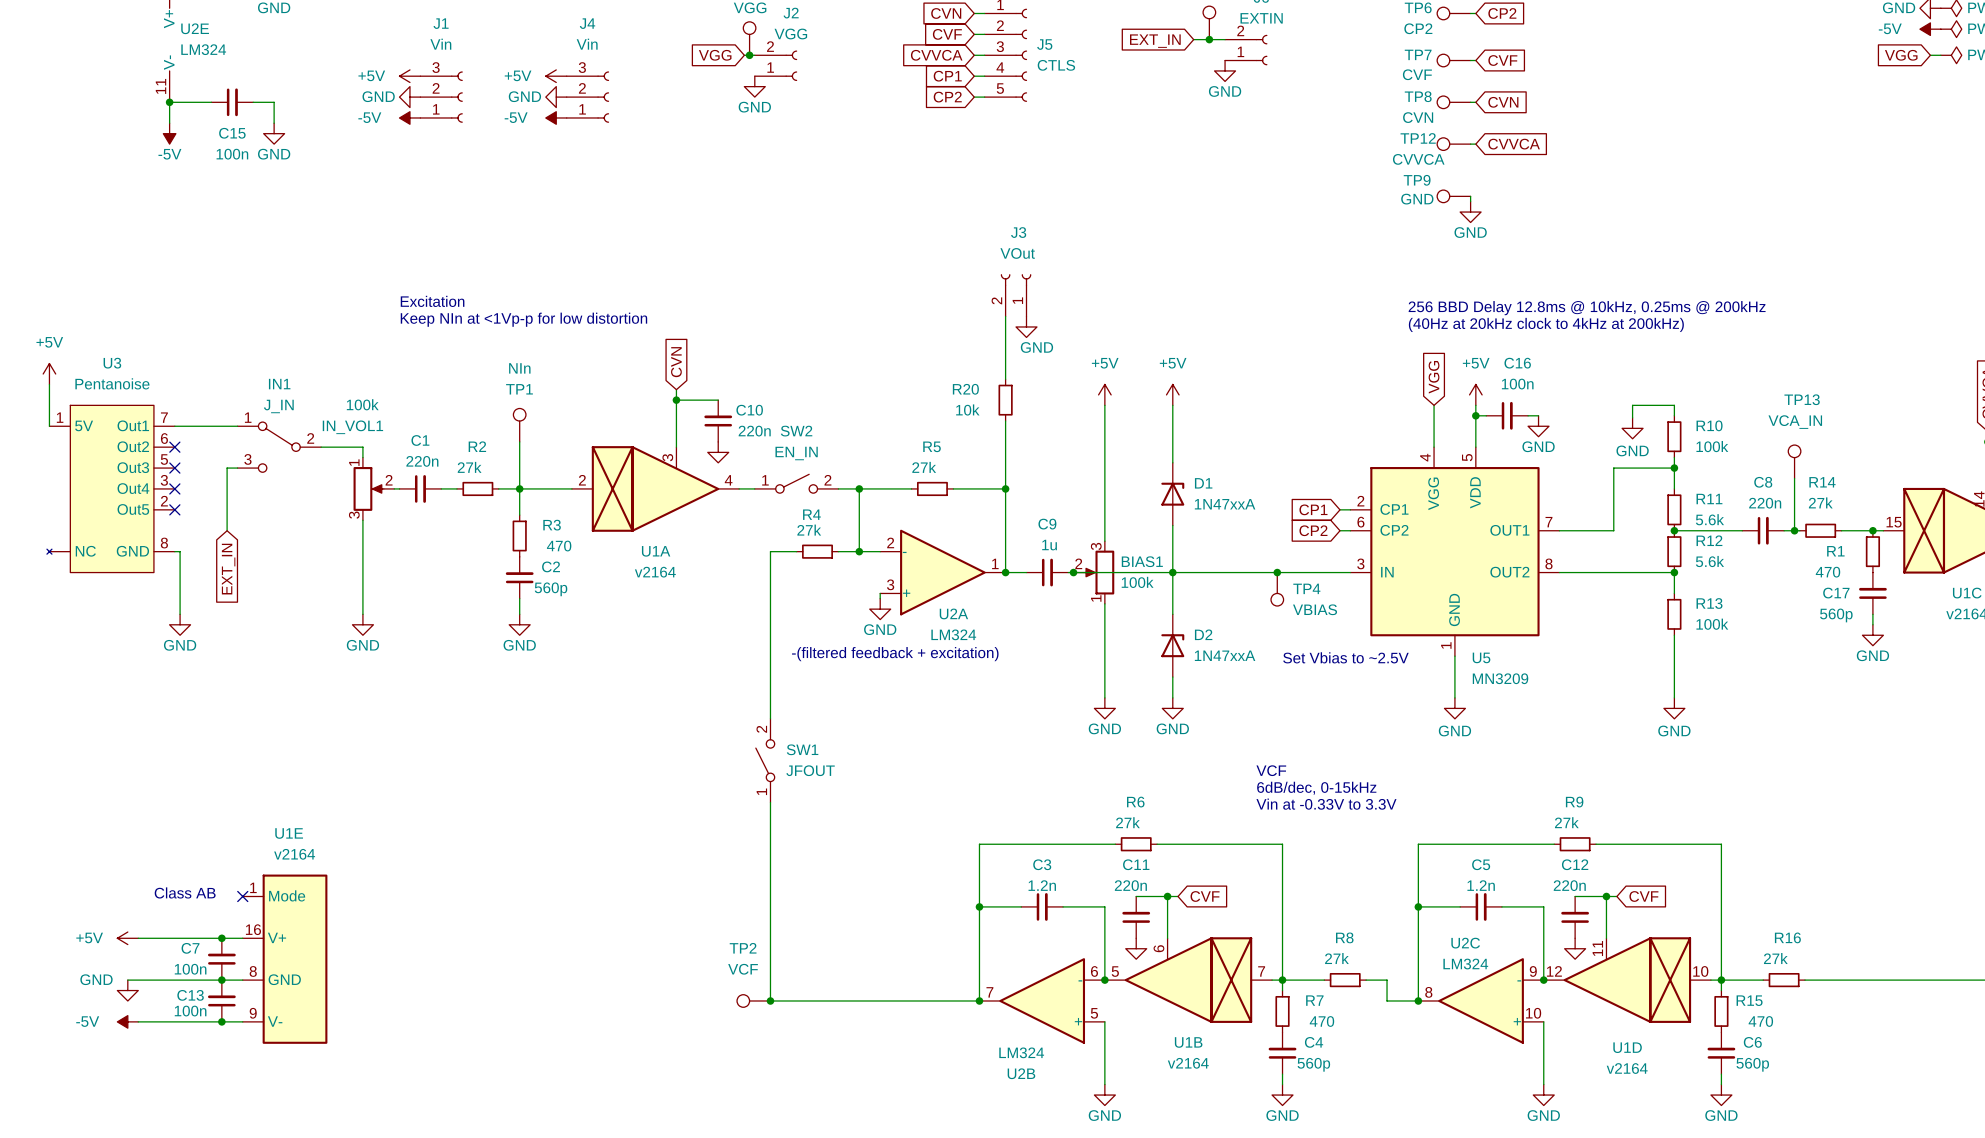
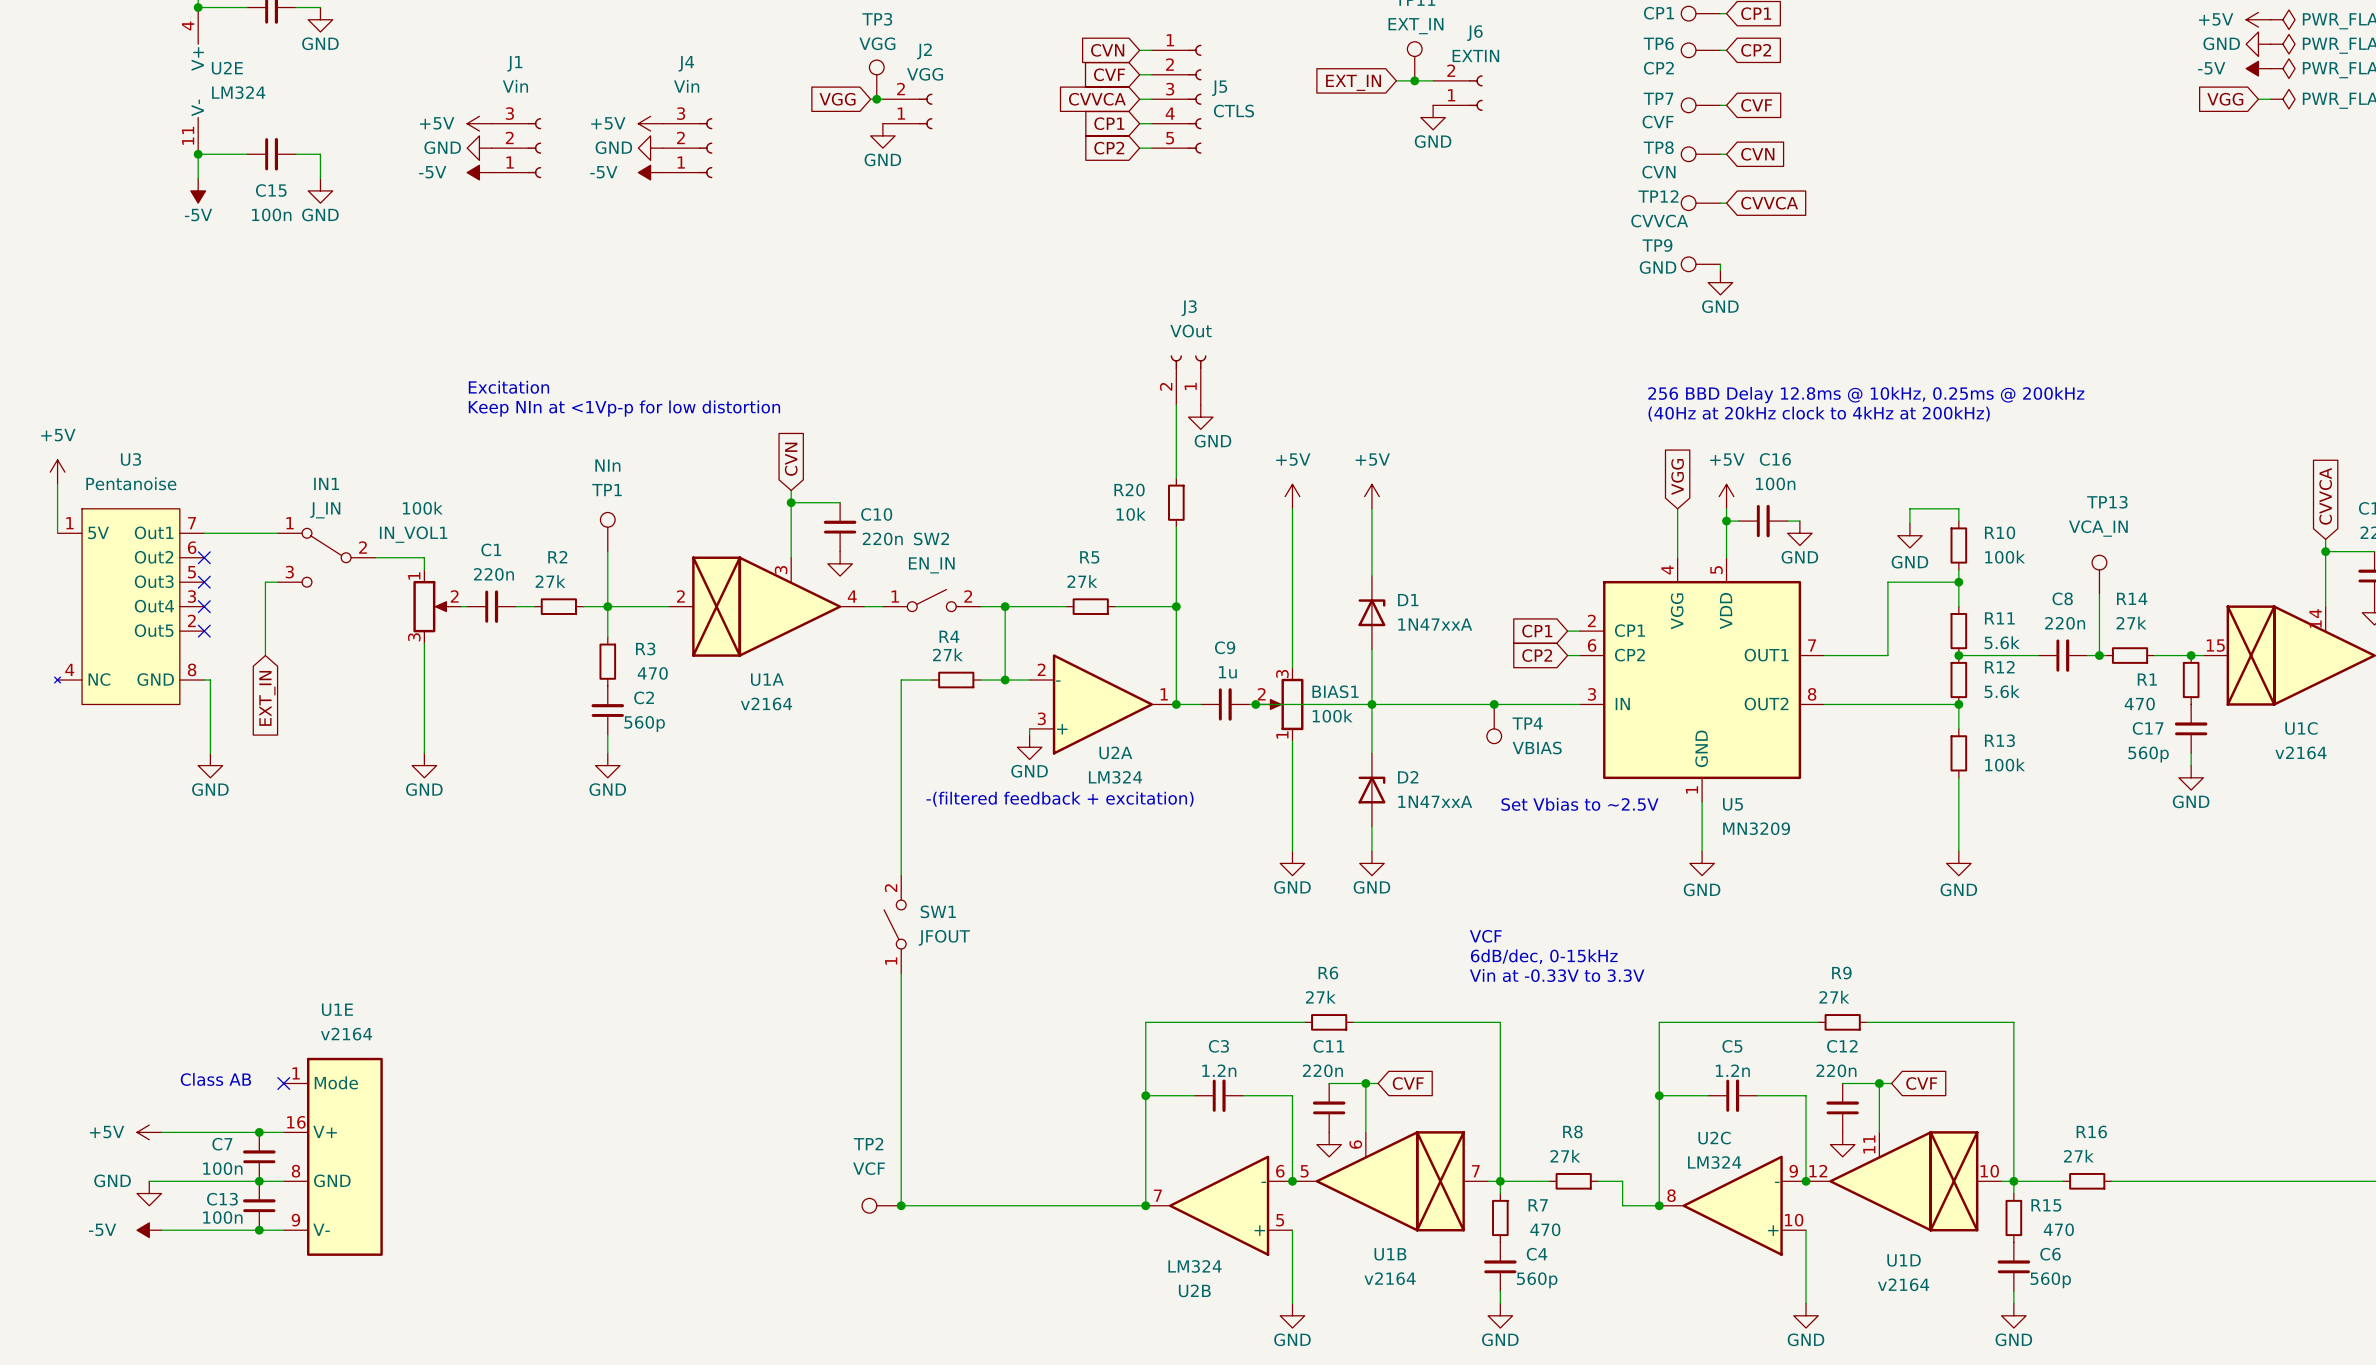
U3 pin number: none -> 4 (69, 669)

